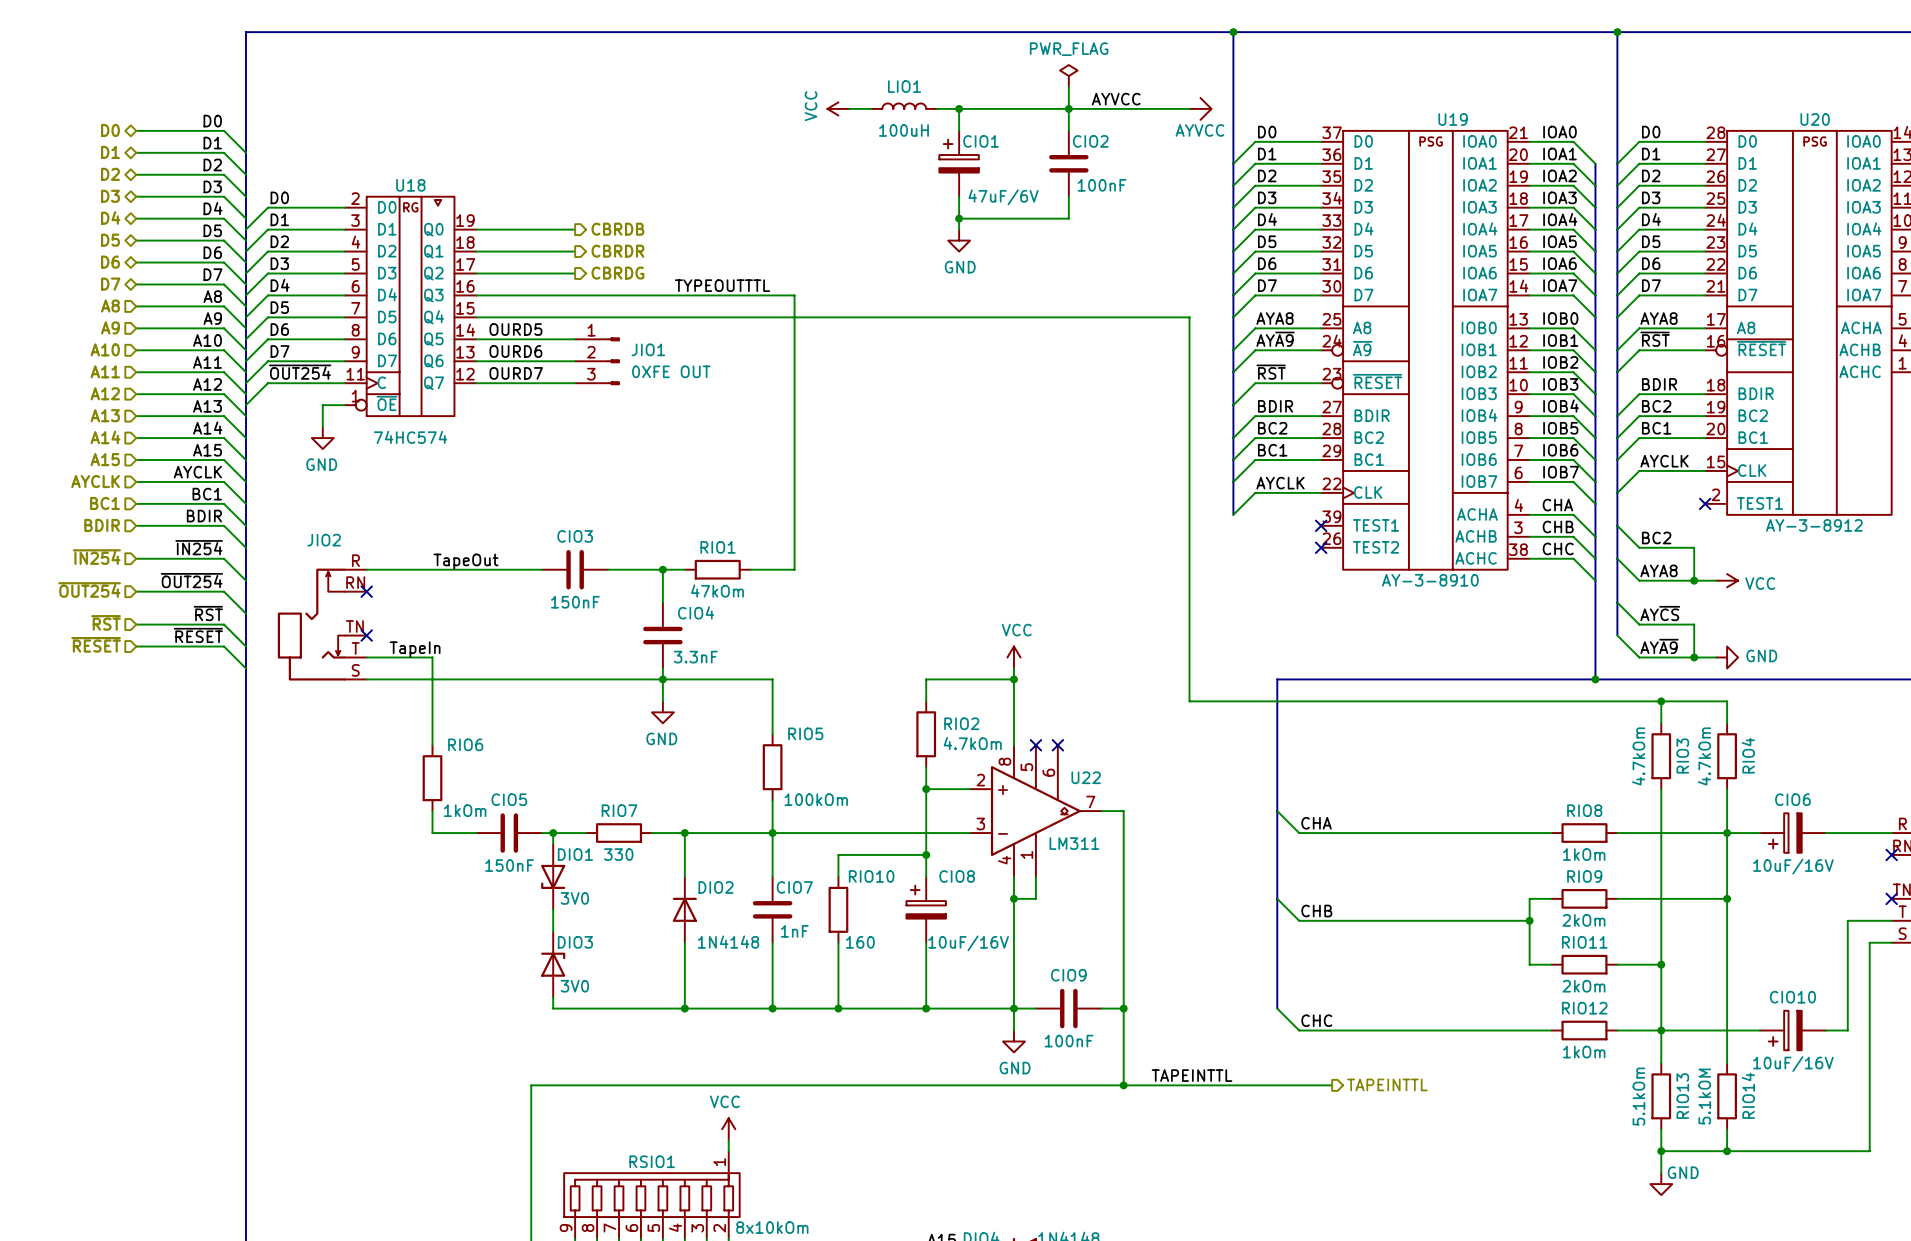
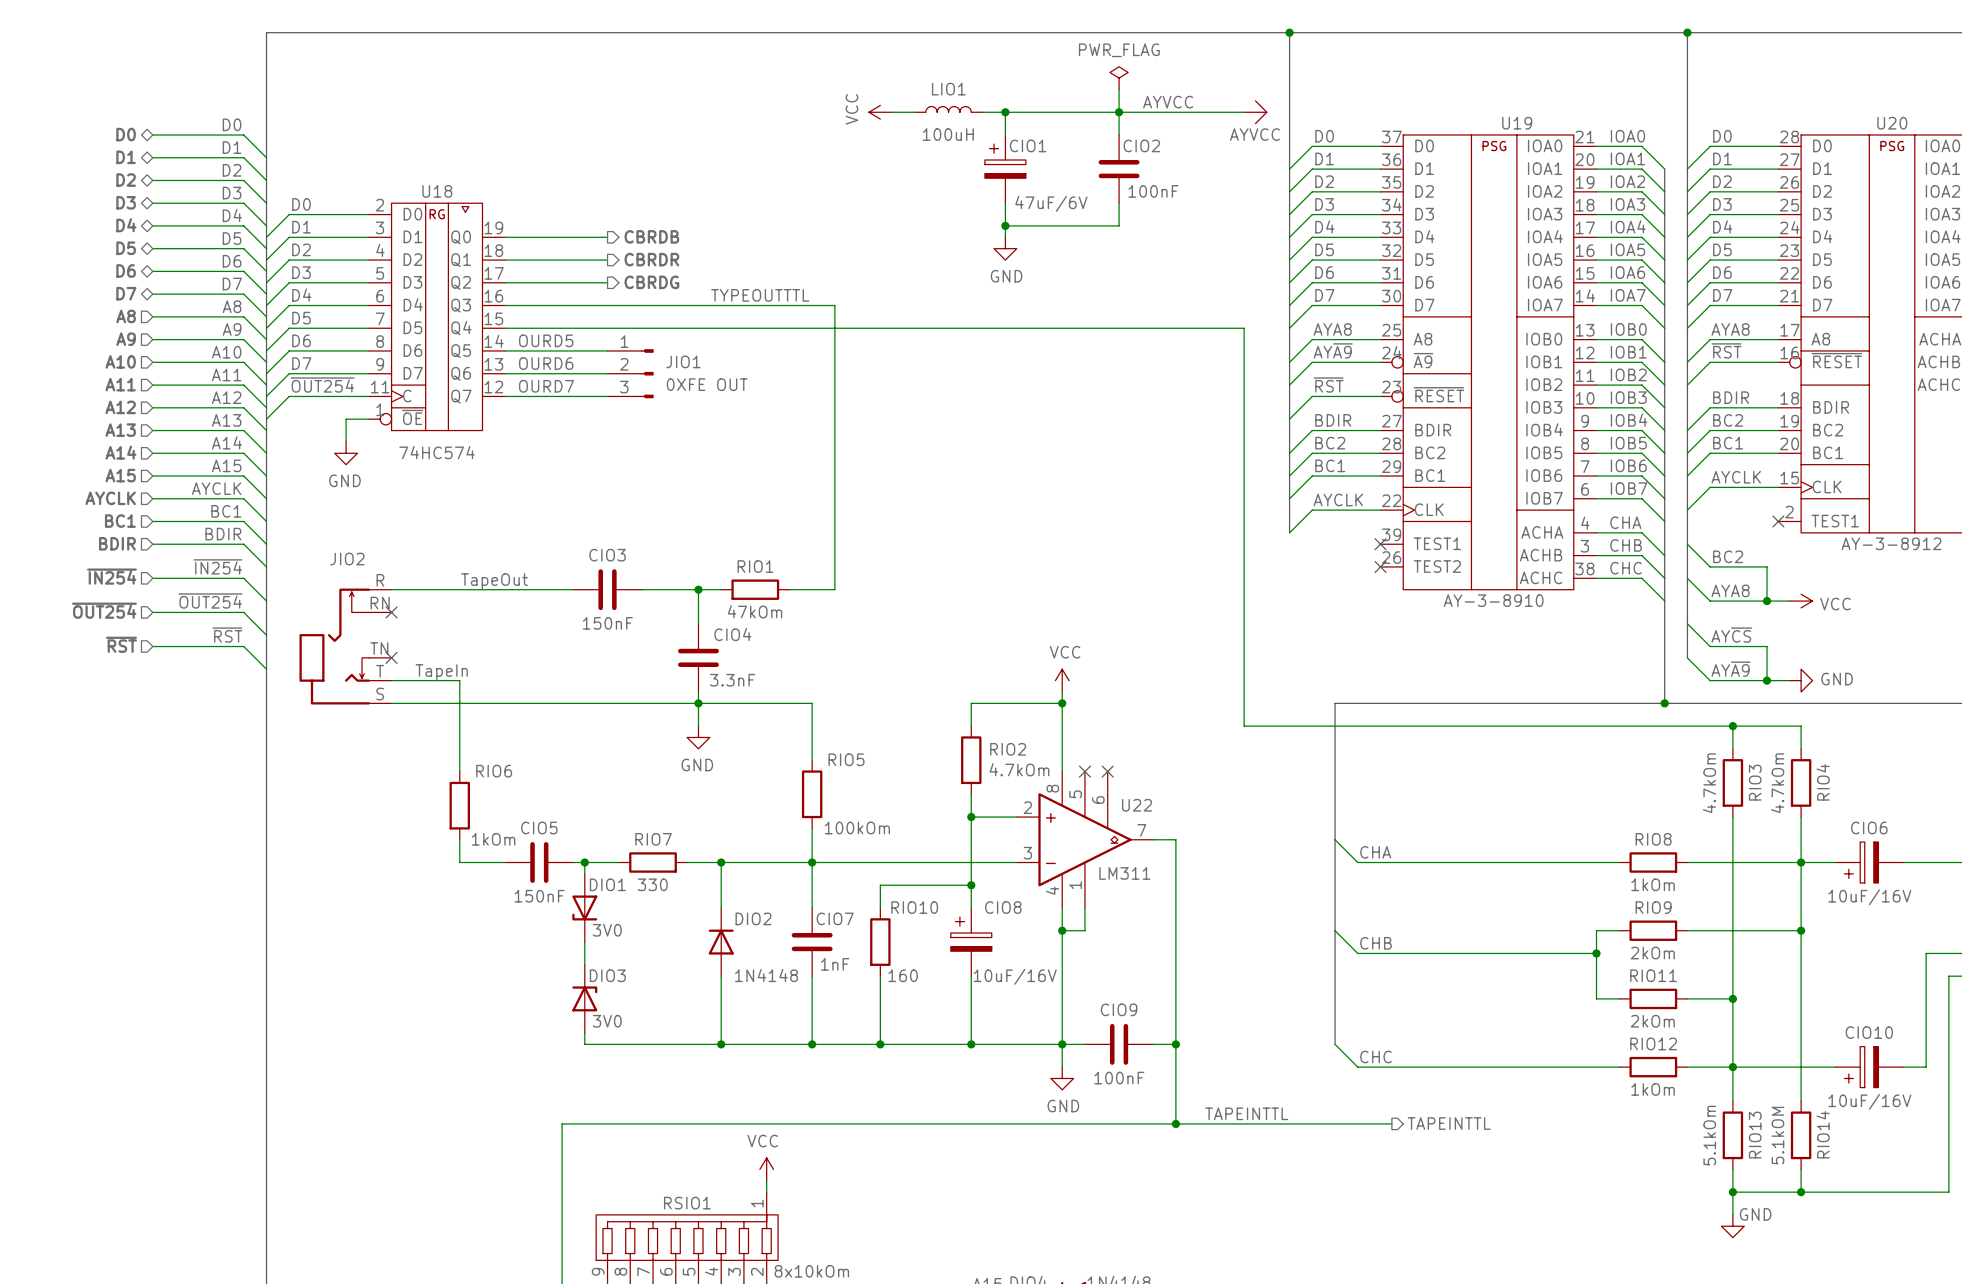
label: ~{RESET} (198, 635) -> none
hierarchical label: ~{RESET} (96, 644) -> none
wire: (136, 646) (224, 646) (246, 668) -> none

